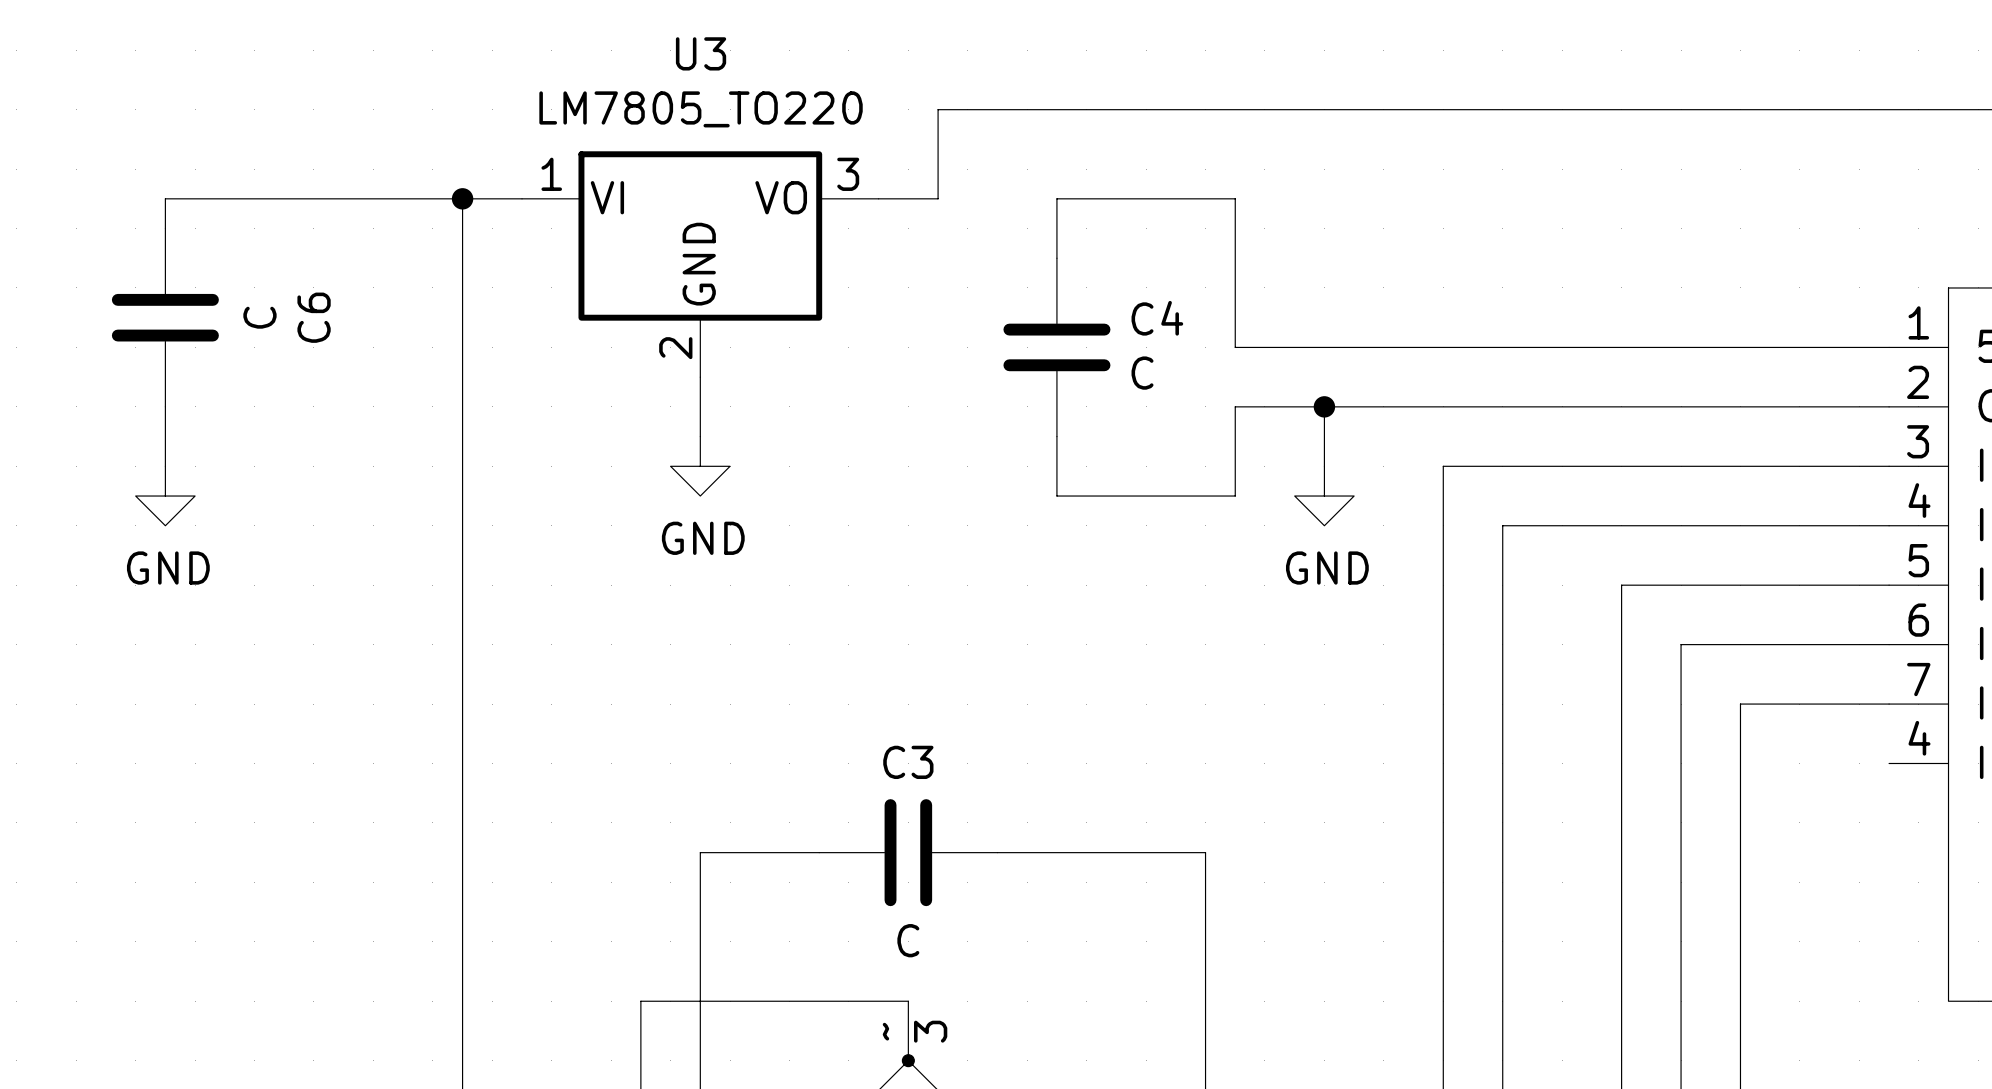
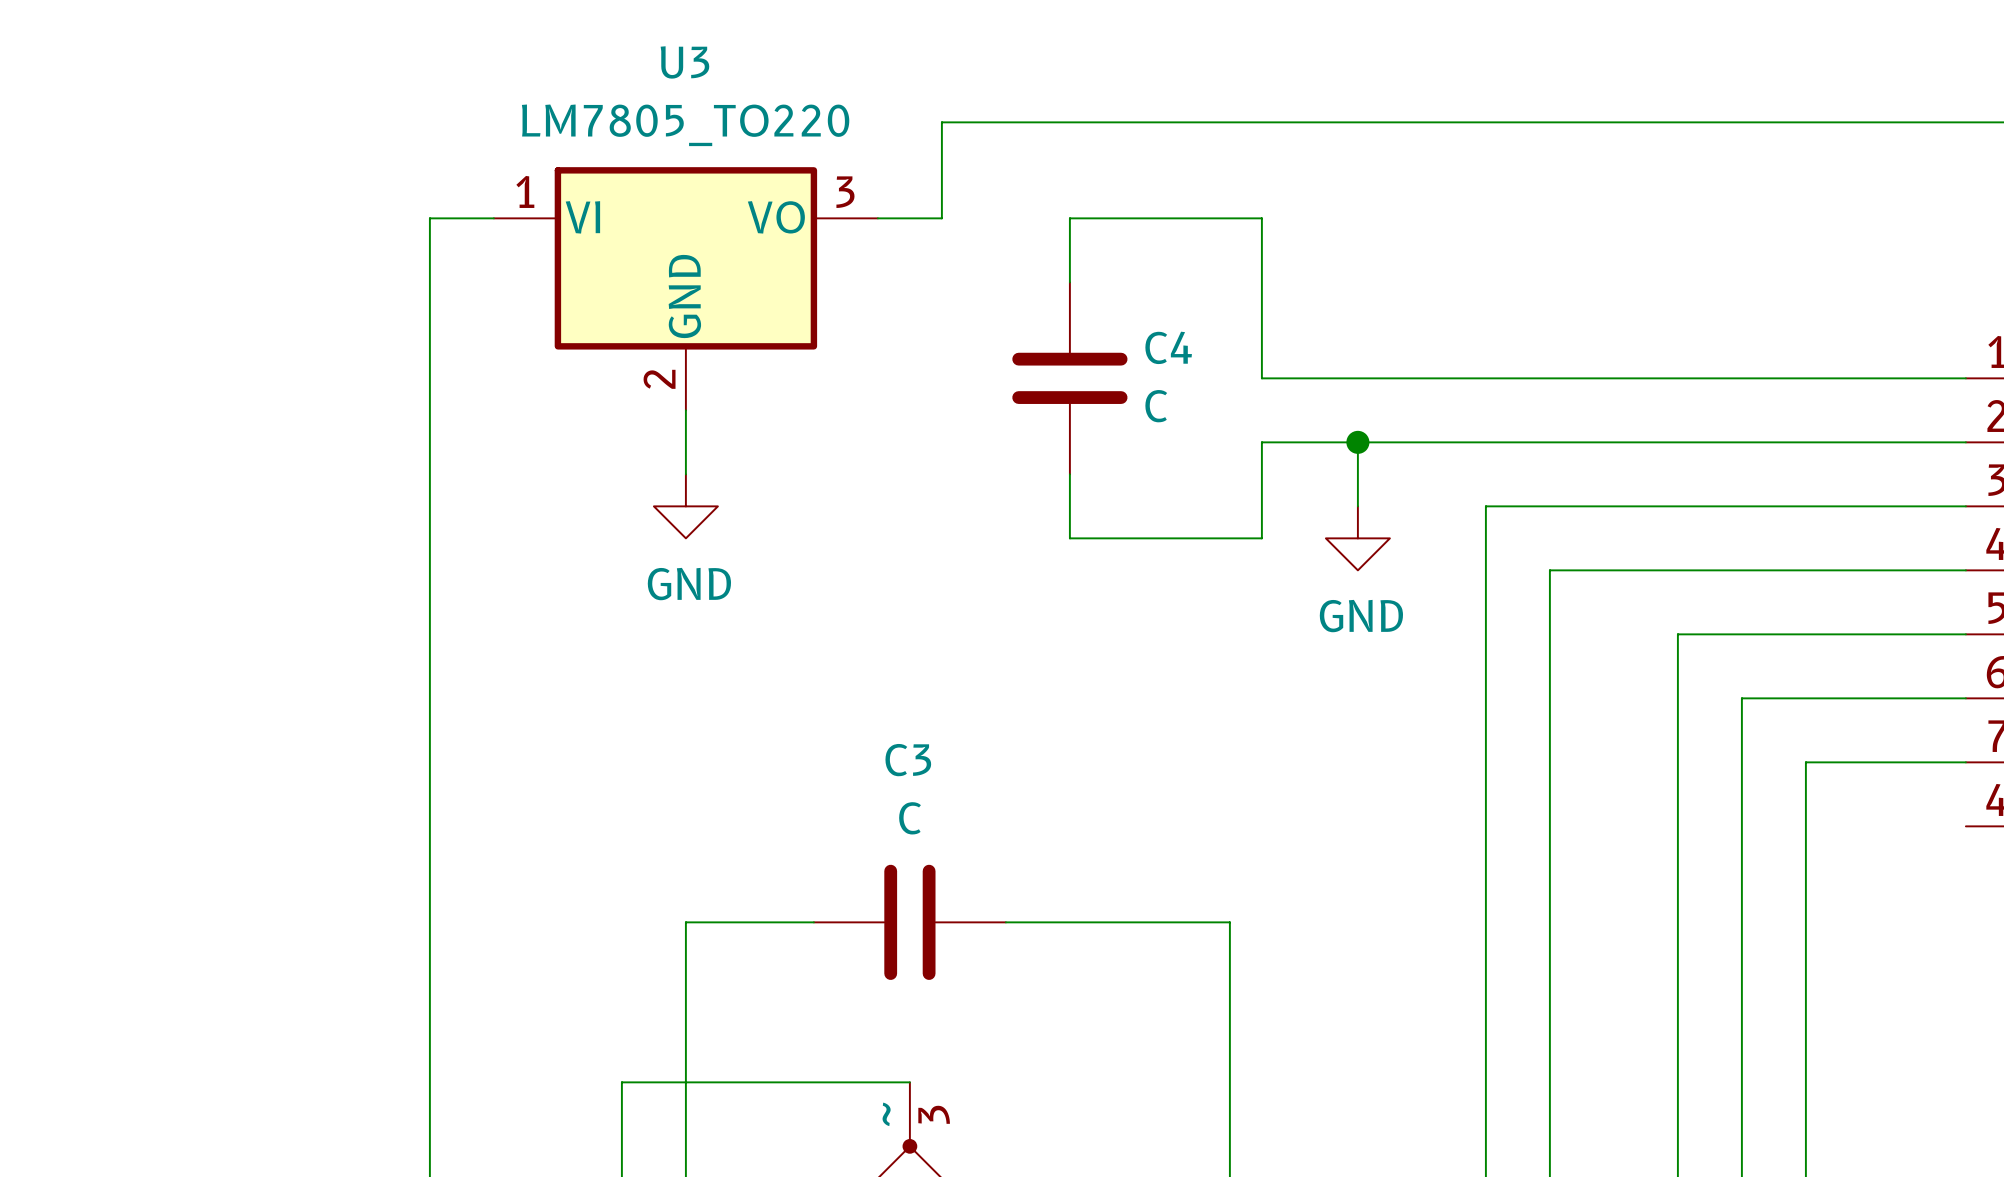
wire: (462, 198) (165, 198) (165, 228) -> none
junction: (462, 198) -> none
C6: C (165, 317) -> none
wire: (165, 406) (165, 466) -> none
power symbol: GND (165, 496) -> none
C3 name position: C3 (908, 762) -> C3 (908, 760)
C3 value position: C (908, 940) -> C (910, 818)

